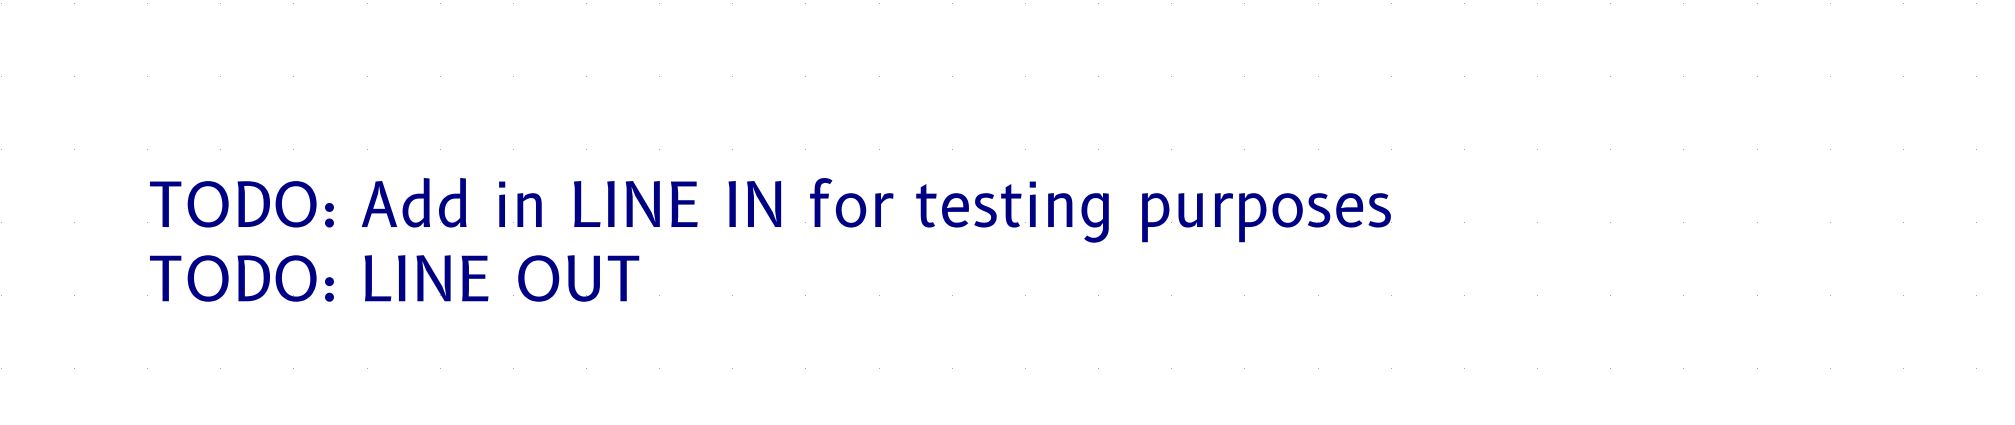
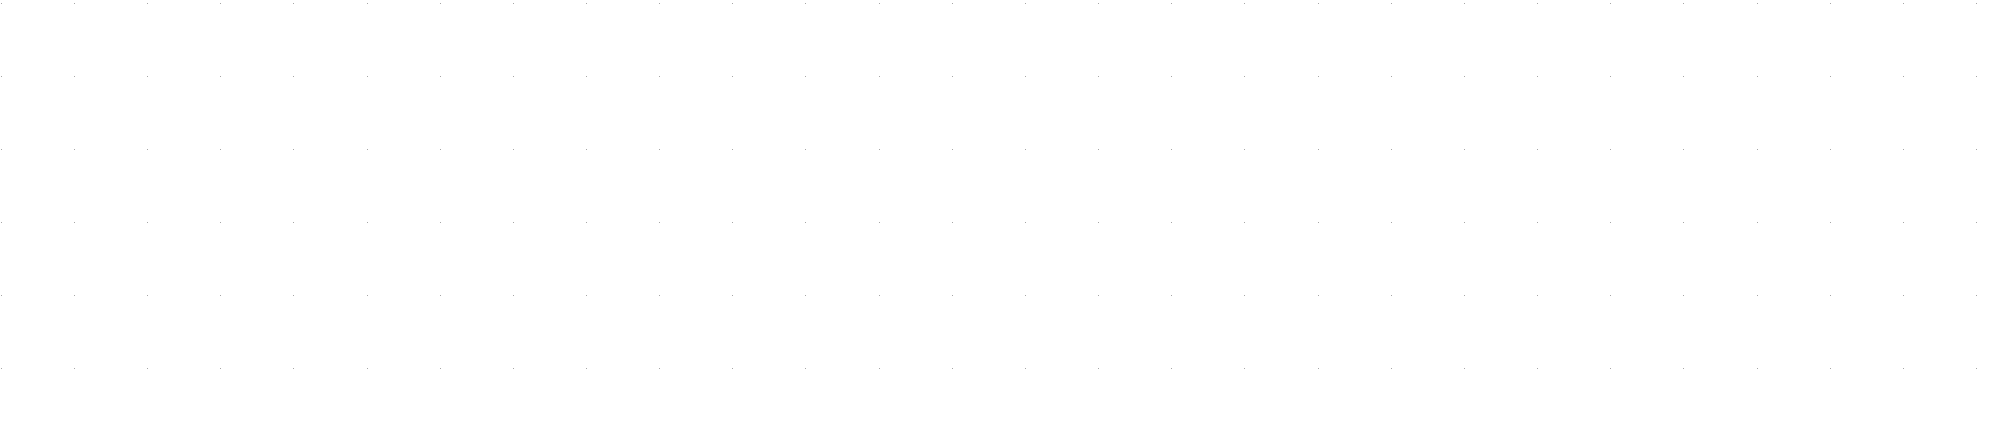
text: TODO: Add in LINE IN for testing purposes (770, 210) -> none
text: TODO: LINE OUT (394, 278) -> none

